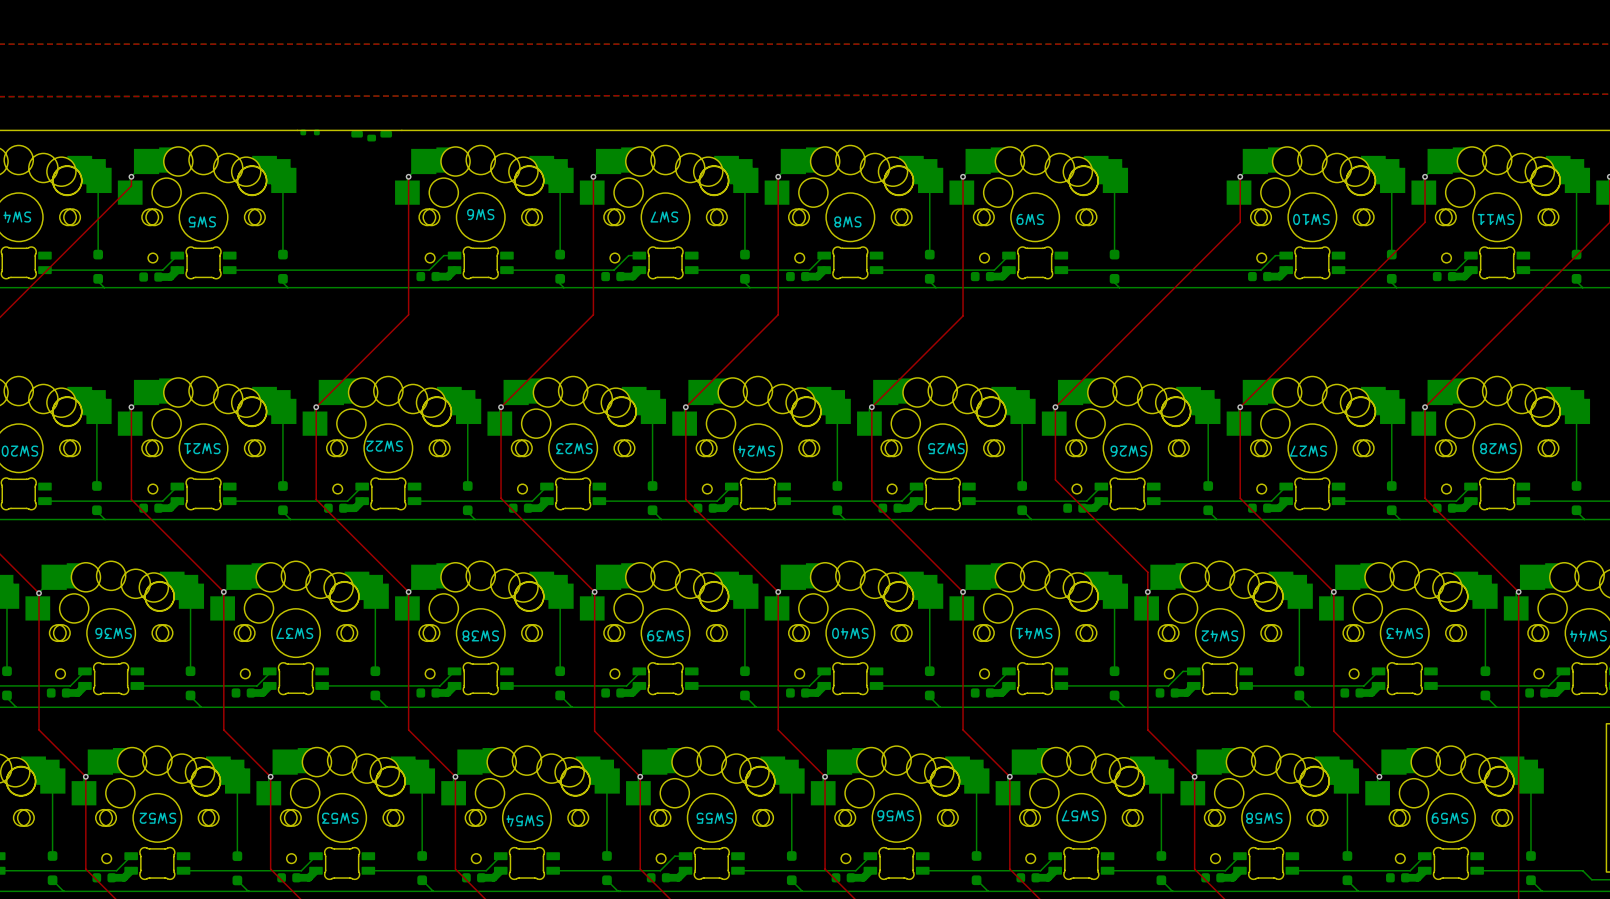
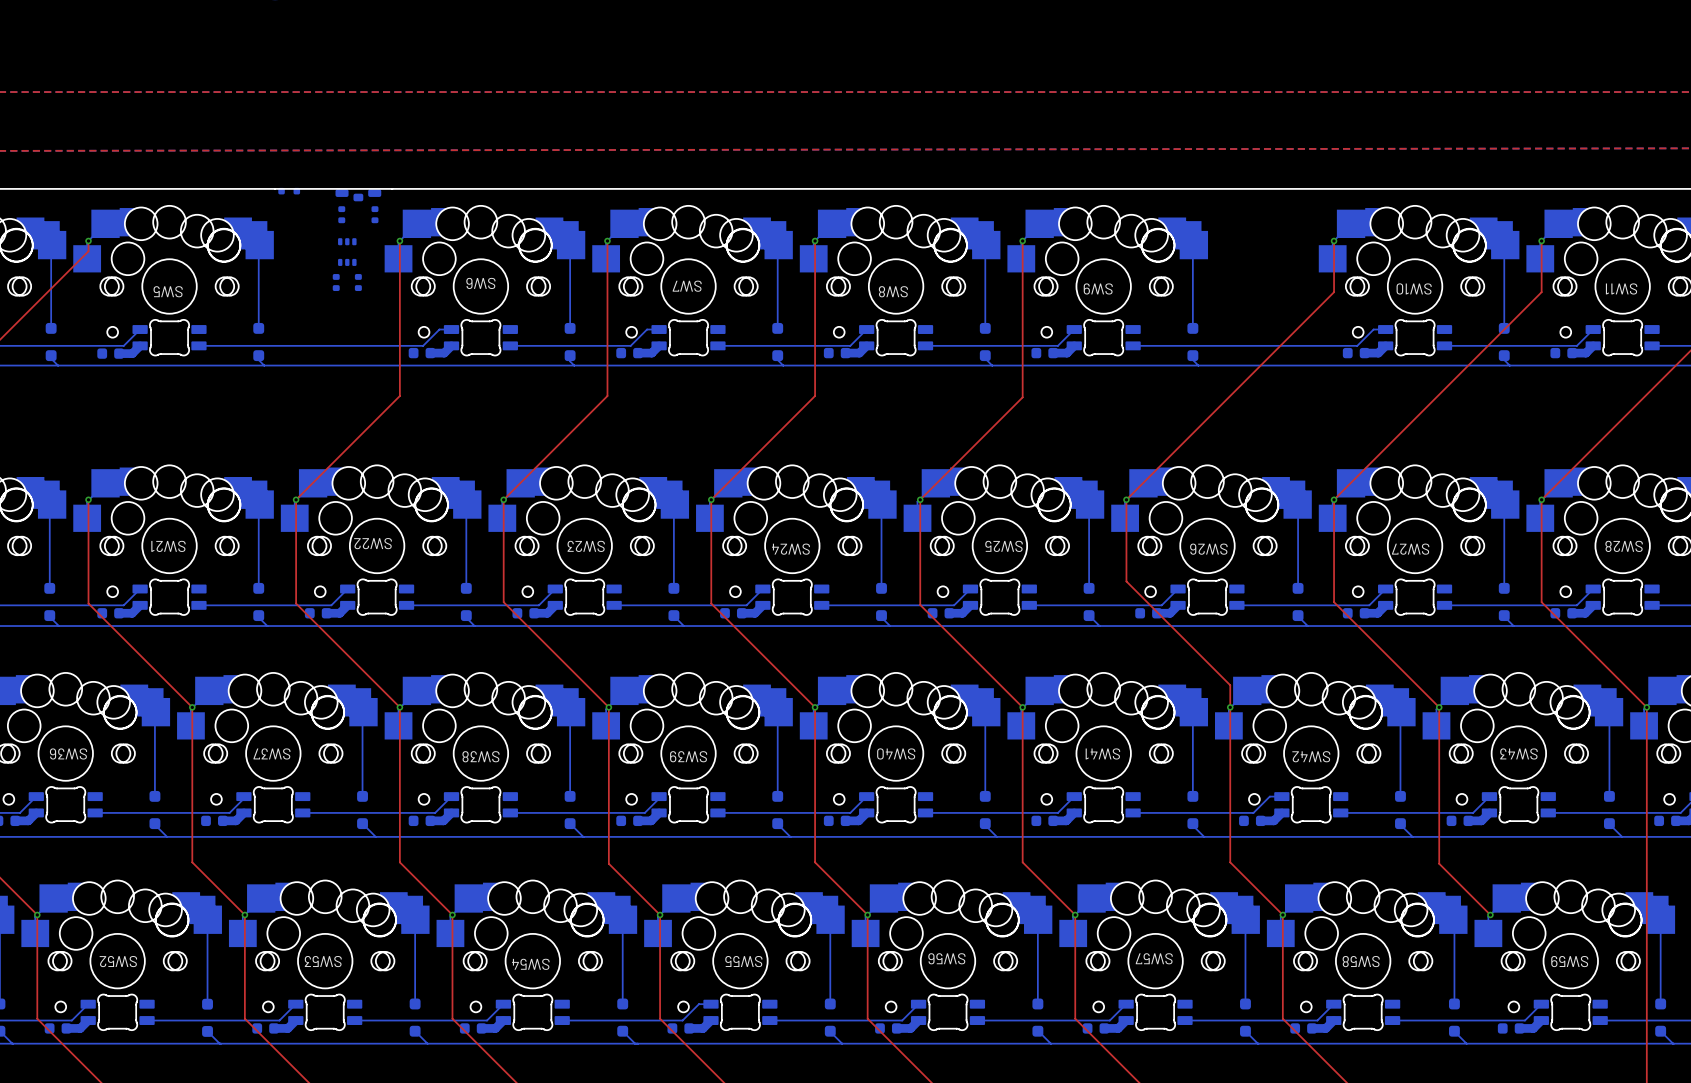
part: none -> (341, 214)
part: none -> (374, 214)
part: none -> (347, 252)
part: none -> (336, 282)
part: none -> (358, 282)

